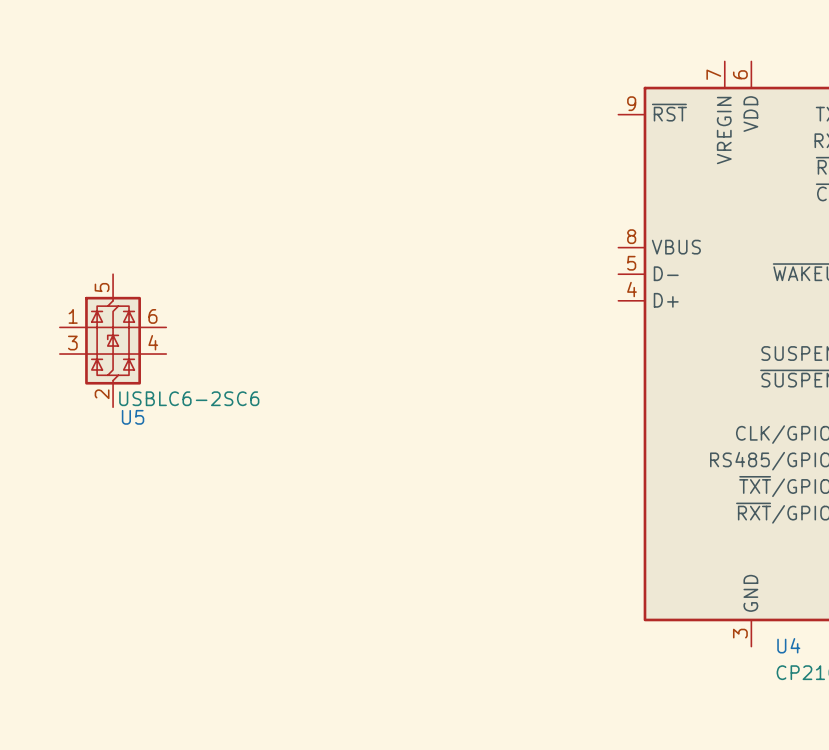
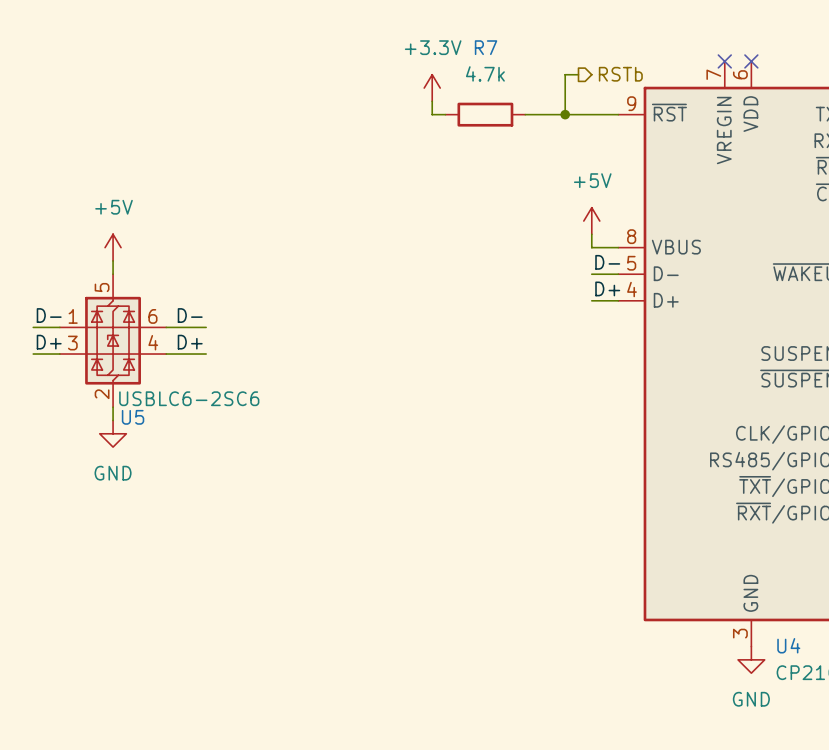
no-connect mark: none -> (724, 61)
no-connect mark: none -> (751, 61)
wire: none -> (578, 74) (565, 74) (565, 114)
hierarchical label: none -> RSTb (620, 74)
power symbol: none -> +3.3V (432, 88)
wire: none -> (432, 101) (432, 114) (445, 114)
R7: none -> 4.7k (485, 114)
wire: none -> (525, 114) (618, 114)
junction: none -> (565, 114)
power symbol: none -> +5V (591, 221)
wire: none -> (591, 234) (591, 247) (618, 247)
power symbol: none -> +5V (113, 247)
wire: none -> (113, 260) (113, 274)
label: none -> D- (607, 262)
wire: none -> (591, 274) (618, 274)
label: none -> D+ (607, 288)
wire: none -> (591, 300) (618, 300)
label: none -> D- (49, 315)
label: none -> D- (190, 315)
wire: none -> (33, 327) (59, 327)
wire: none -> (166, 327) (206, 327)
label: none -> D+ (49, 342)
label: none -> D+ (190, 342)
wire: none -> (33, 354) (59, 354)
wire: none -> (166, 354) (206, 354)
wire: none -> (113, 407) (113, 420)
power symbol: none -> GND (113, 433)
power symbol: none -> GND (751, 659)

